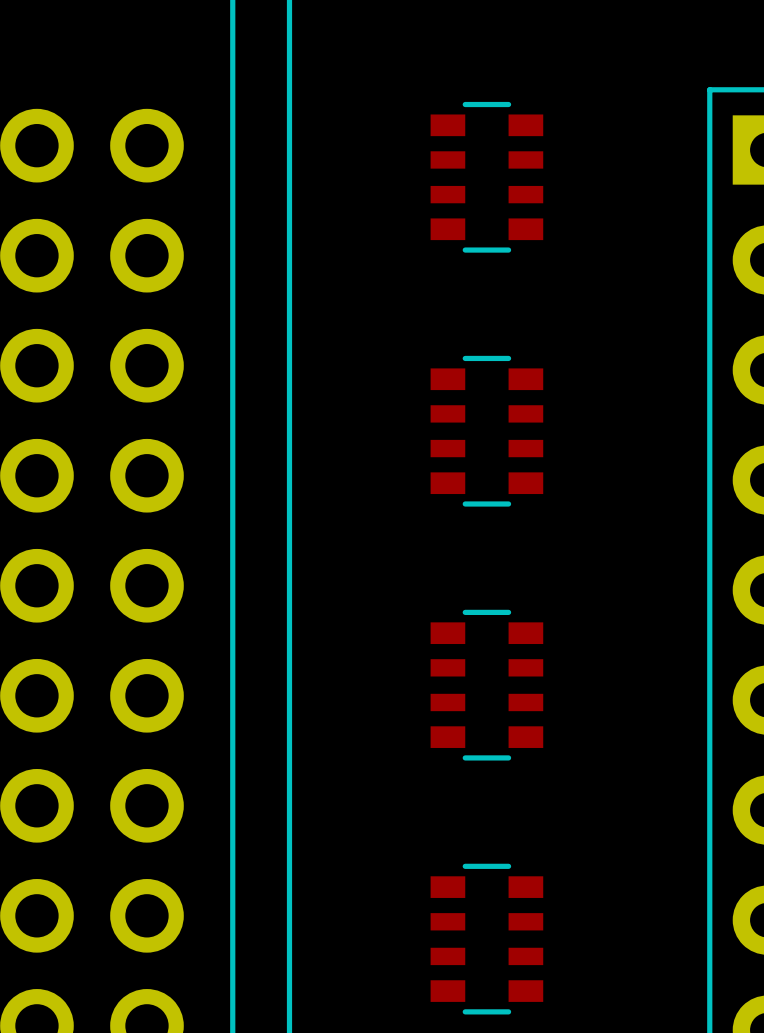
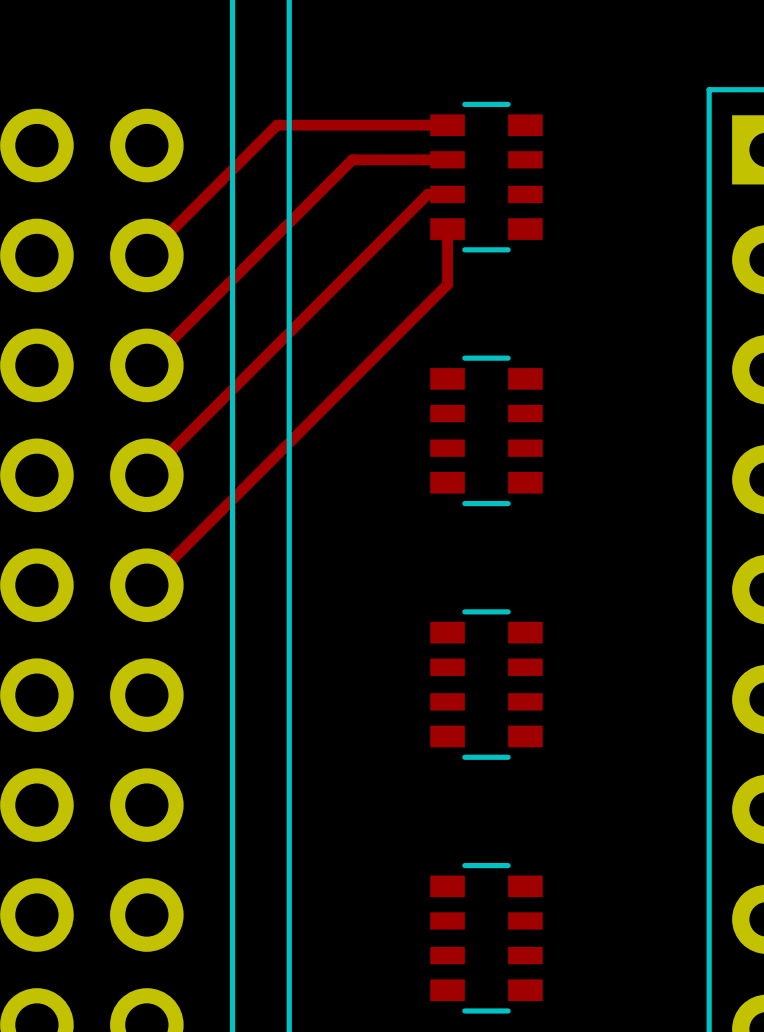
top track: none -> (447, 125) (277, 125) (146, 255)
top track: none -> (447, 159) (352, 159) (146, 365)
top track: none -> (447, 194) (427, 194) (146, 475)
top track: none -> (447, 229) (447, 284) (146, 585)

